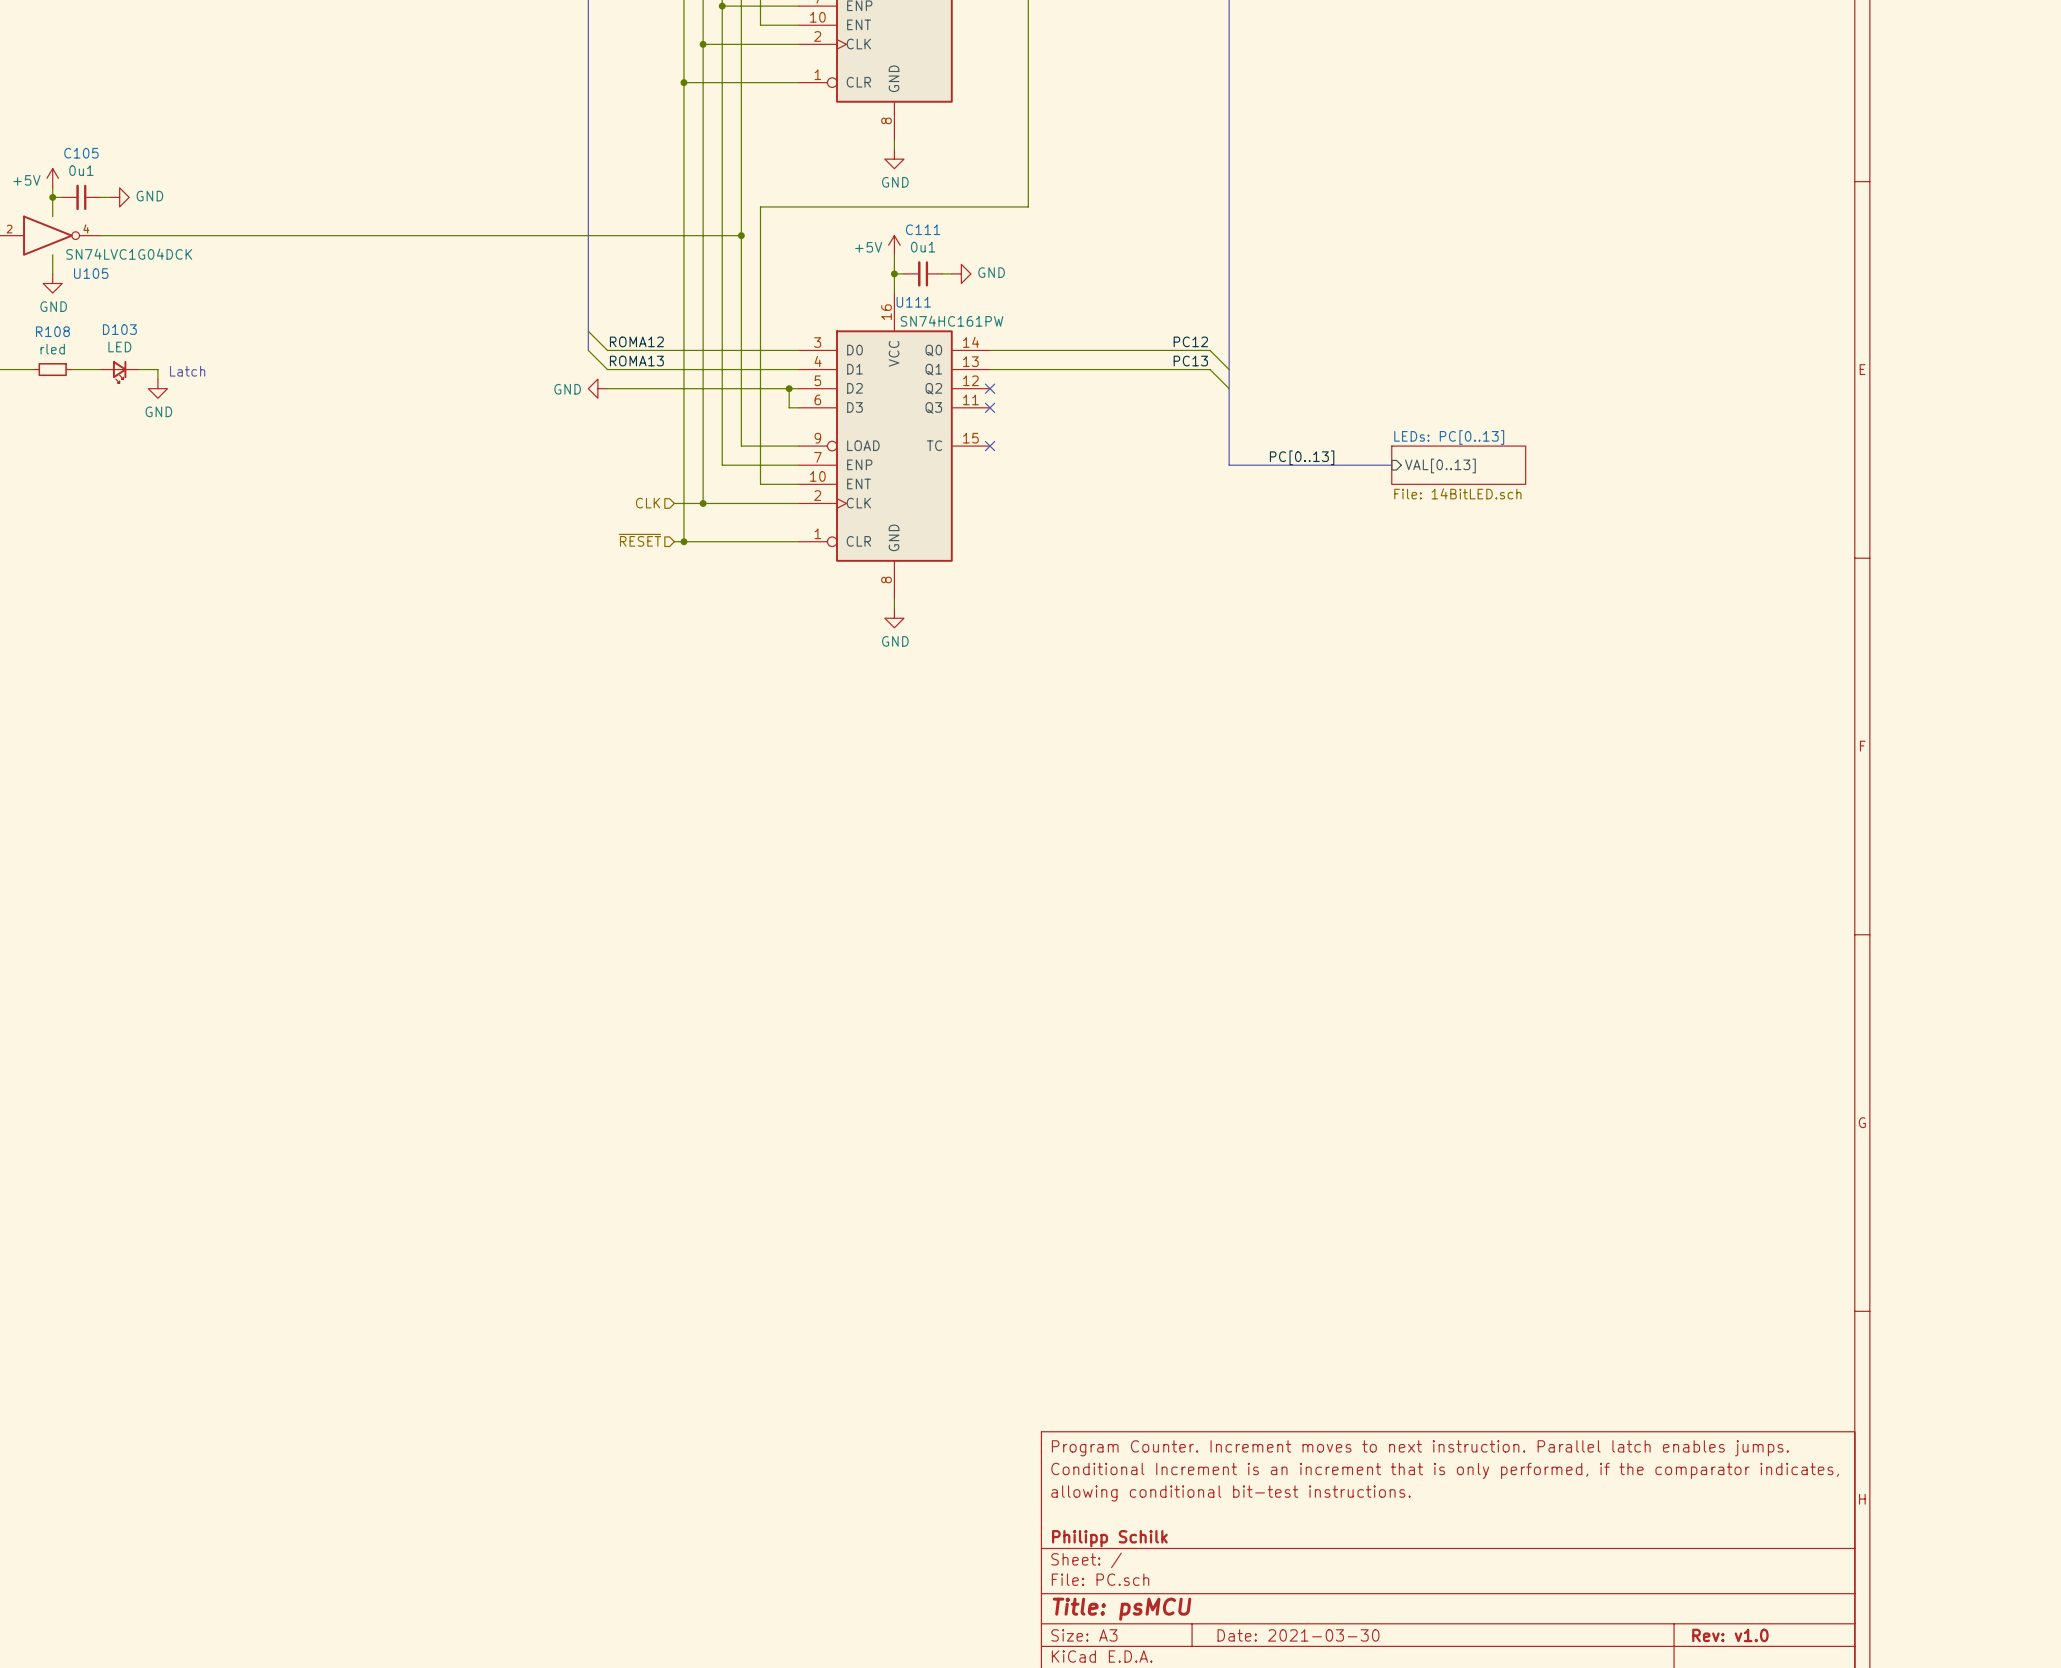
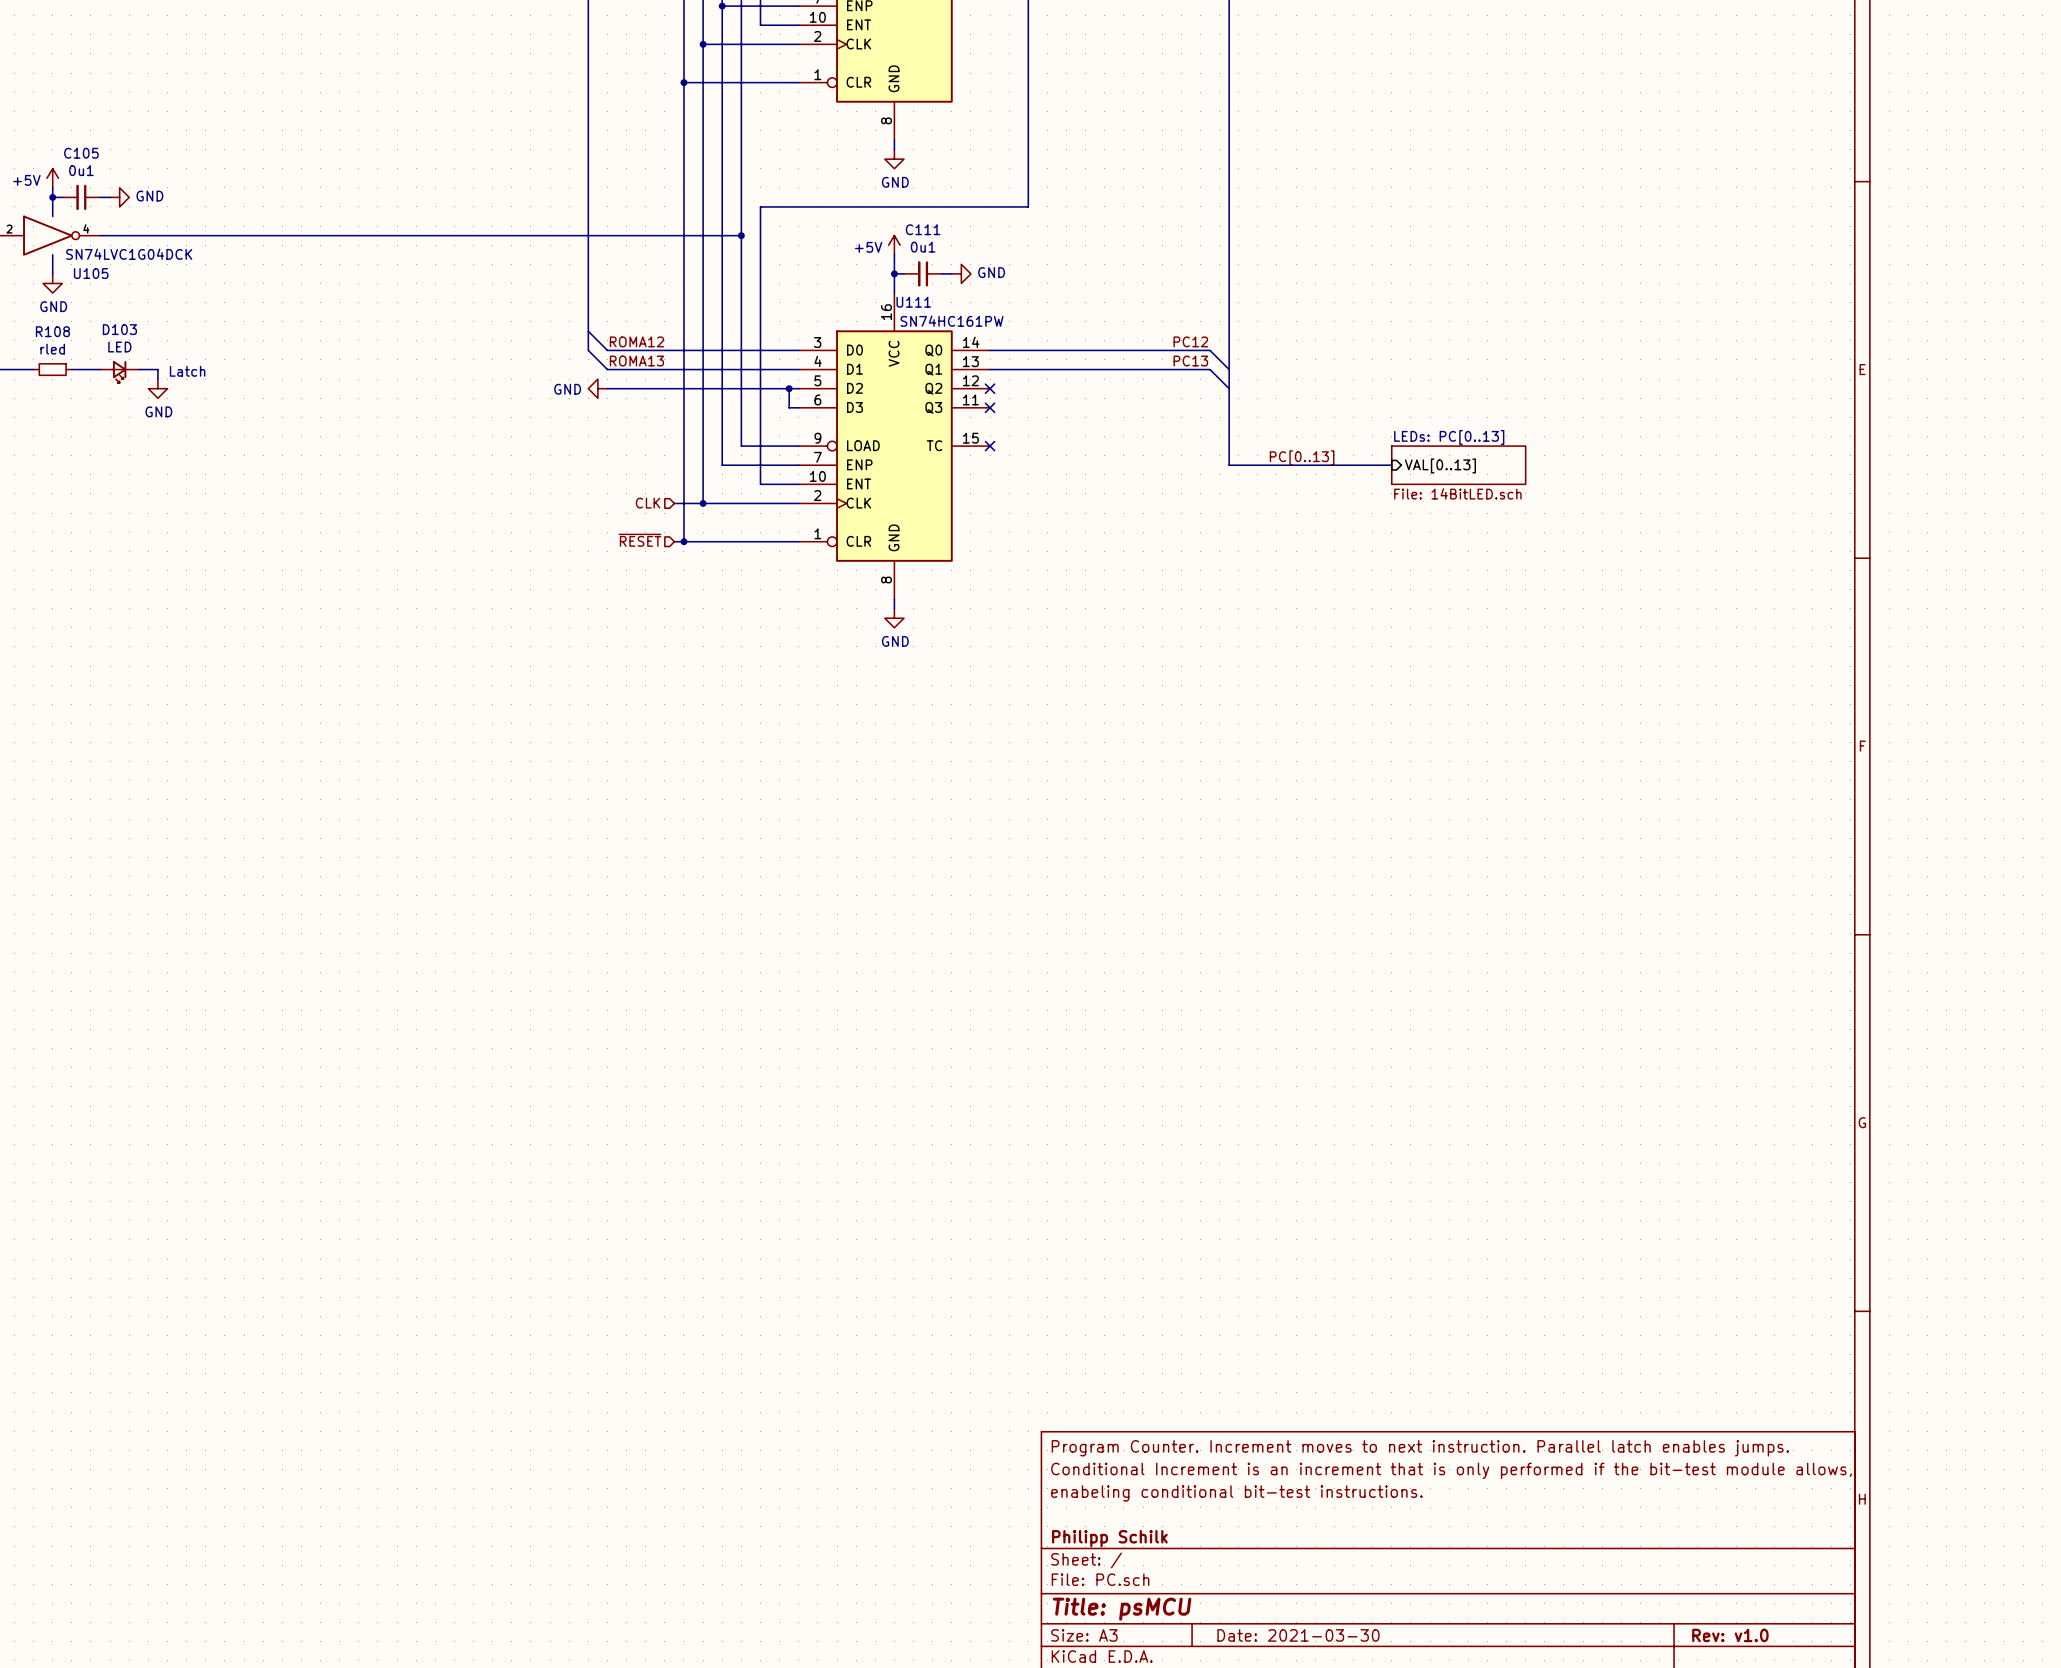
title block: Conditional Increment is an increment that is only performed, if the comparator indicates, (1445, 1470) -> Conditional Increment is an increment that is only performed if the bit-test module allows, (1451, 1470)
title block: allowing conditional bit-test instructions. (1231, 1493) -> enabeling conditional bit-test instructions. (1236, 1493)

